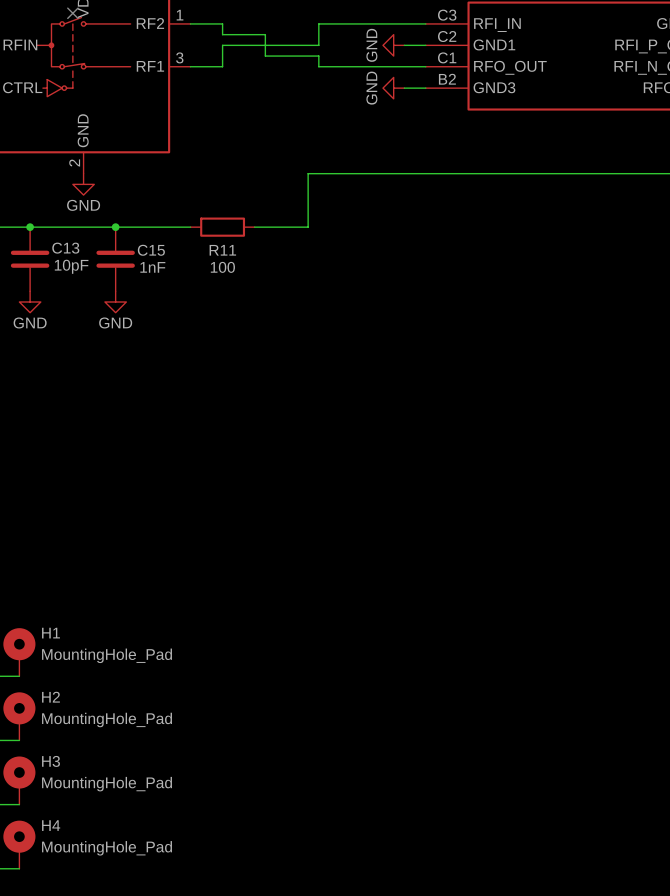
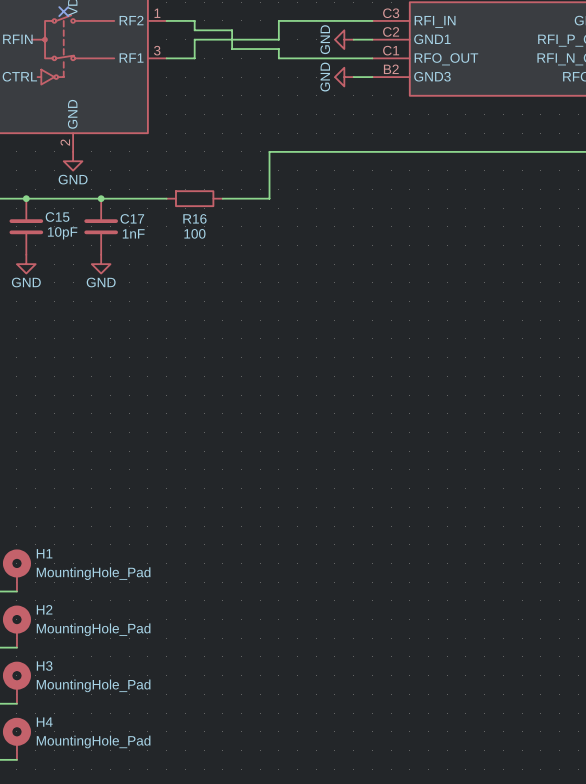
C13 name: C13 (65, 248) -> C15 (57, 217)
C15 name: C15 (151, 250) -> C17 (132, 218)
R11 name: R11 (222, 250) -> R16 (194, 218)

